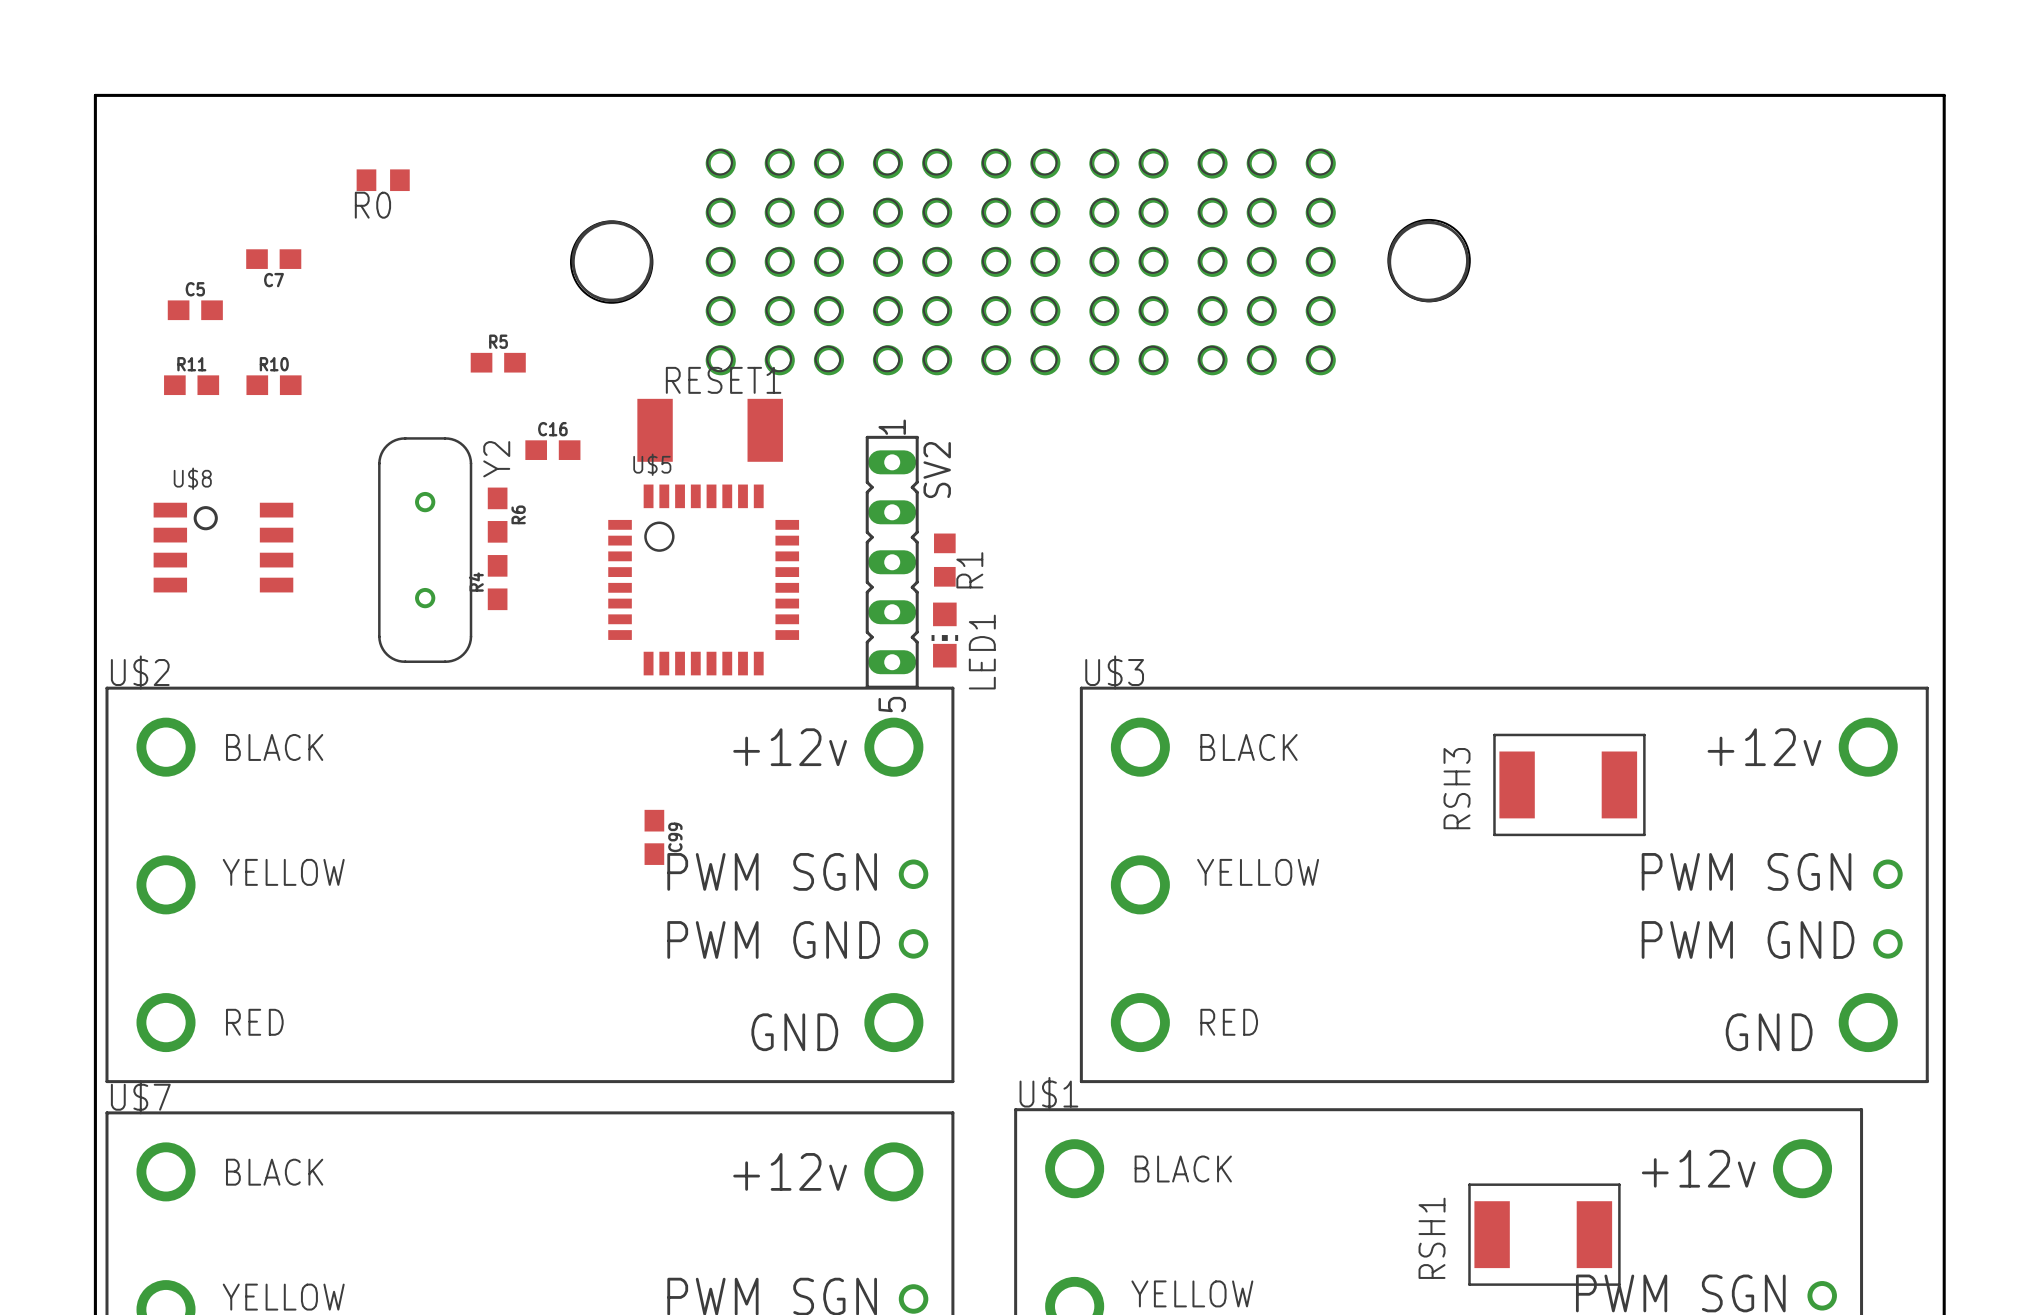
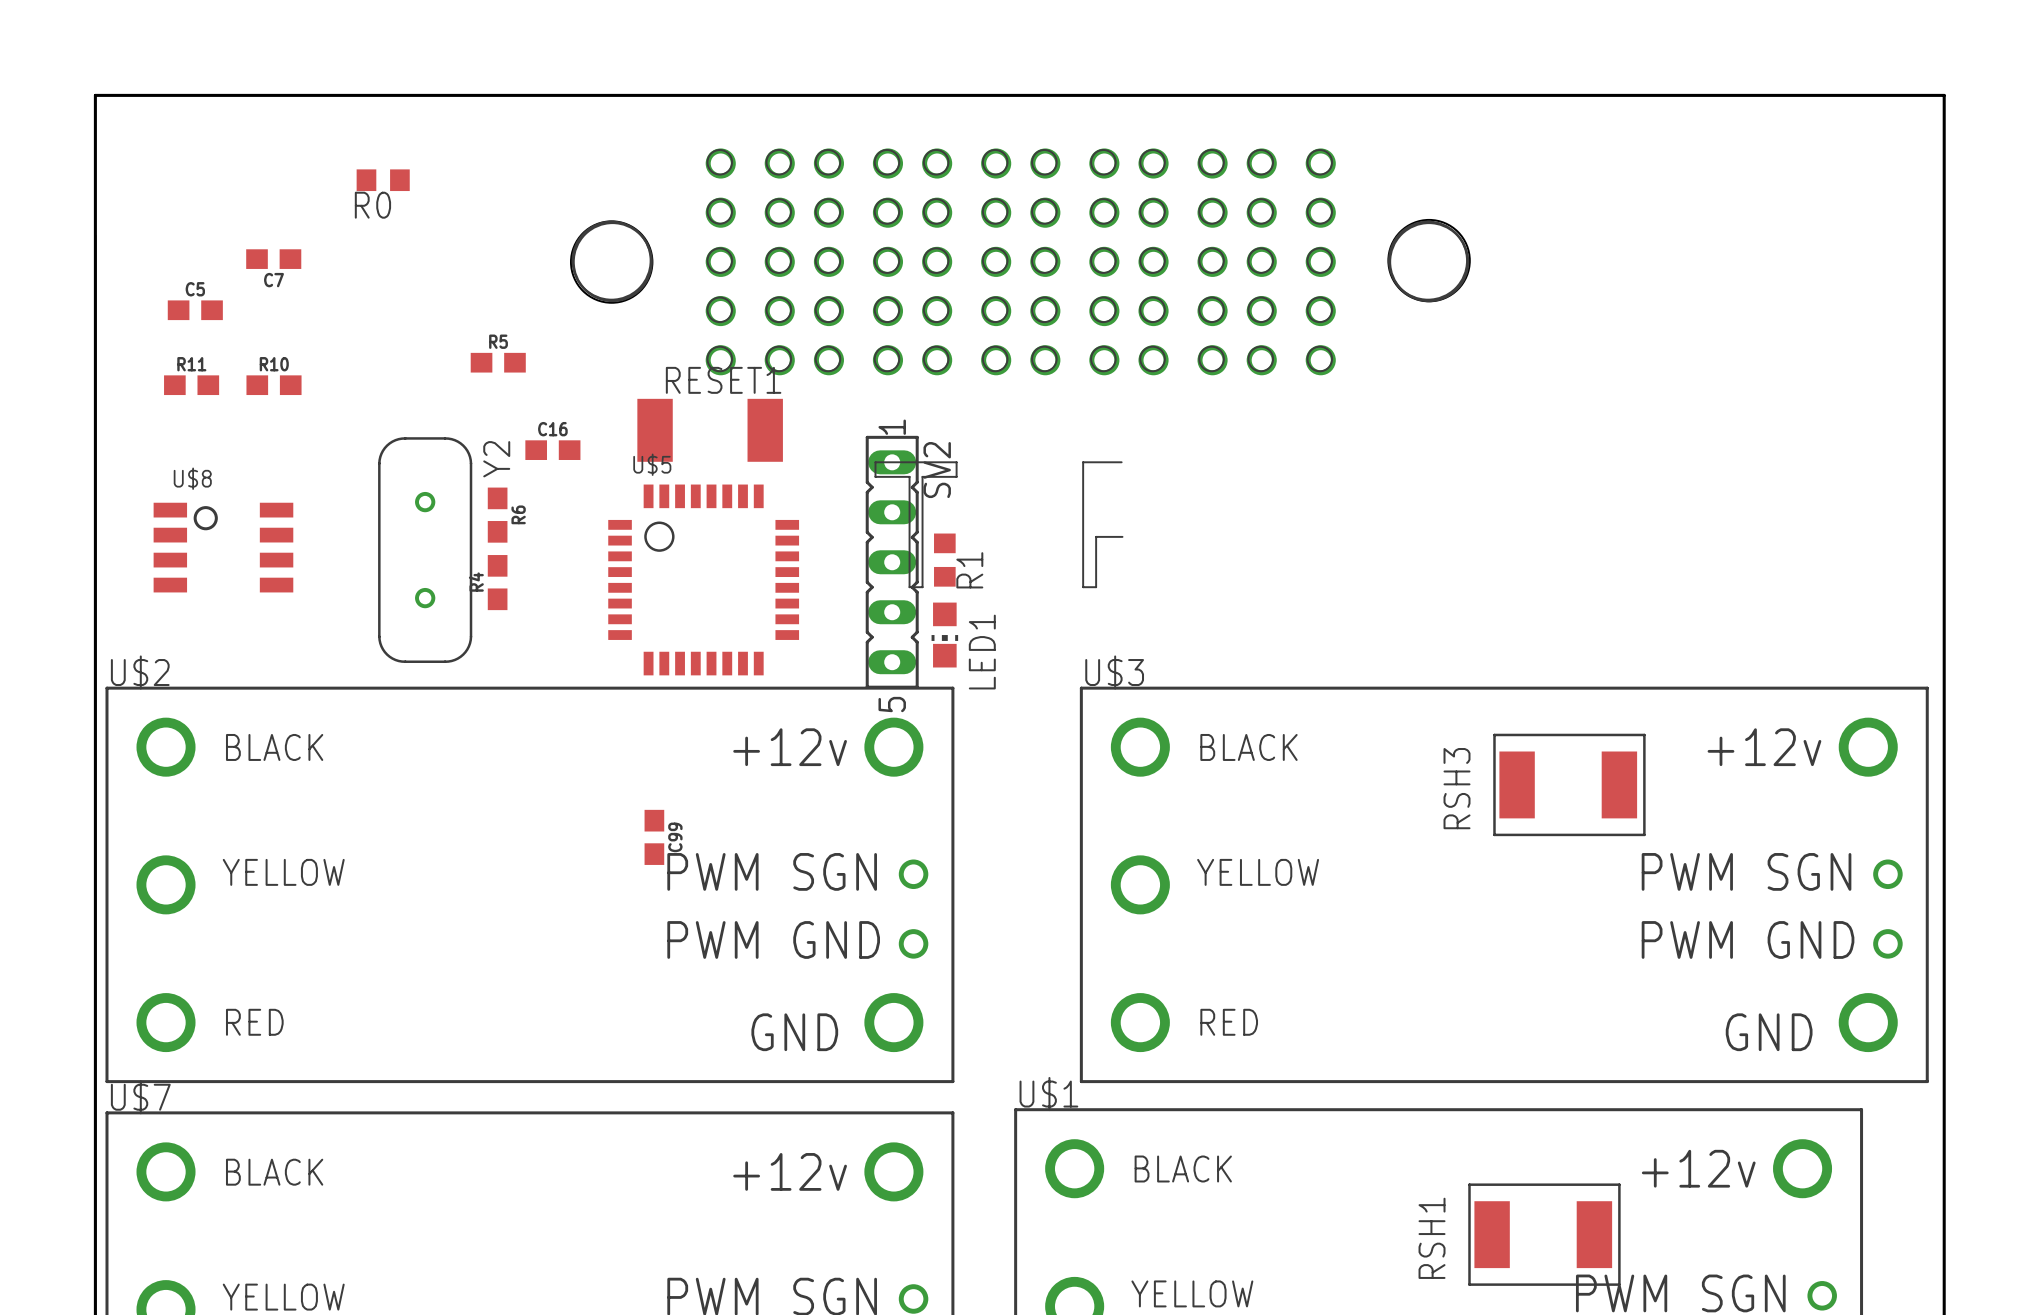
line: none -> (875, 462) (956, 462) (956, 476) (922, 476) (922, 587) (909, 587) (909, 476) (875, 476) (875, 462)
line: none -> (1121, 462) (1083, 462) (1083, 587) (1096, 587) (1096, 536) (1122, 536)

